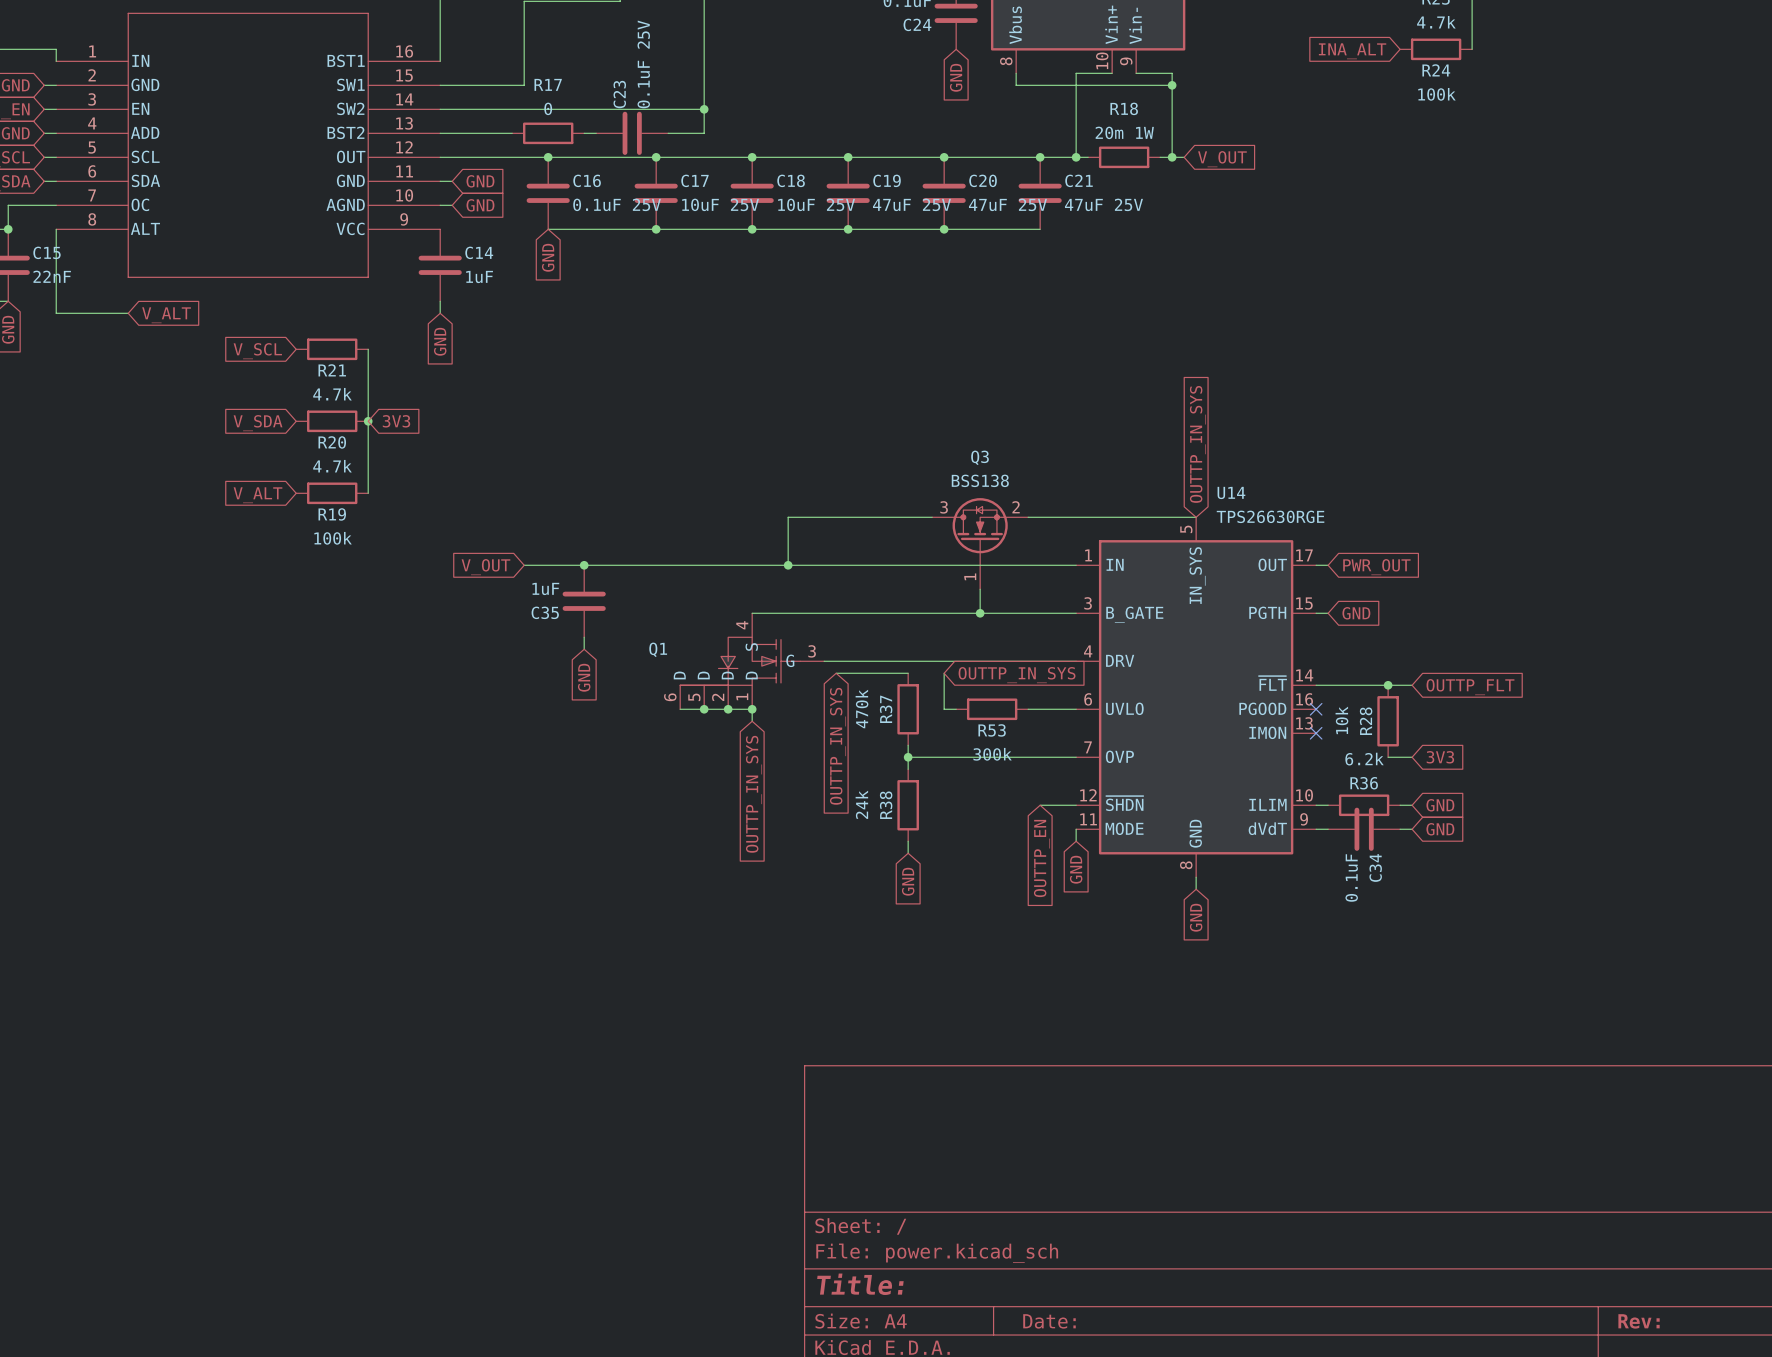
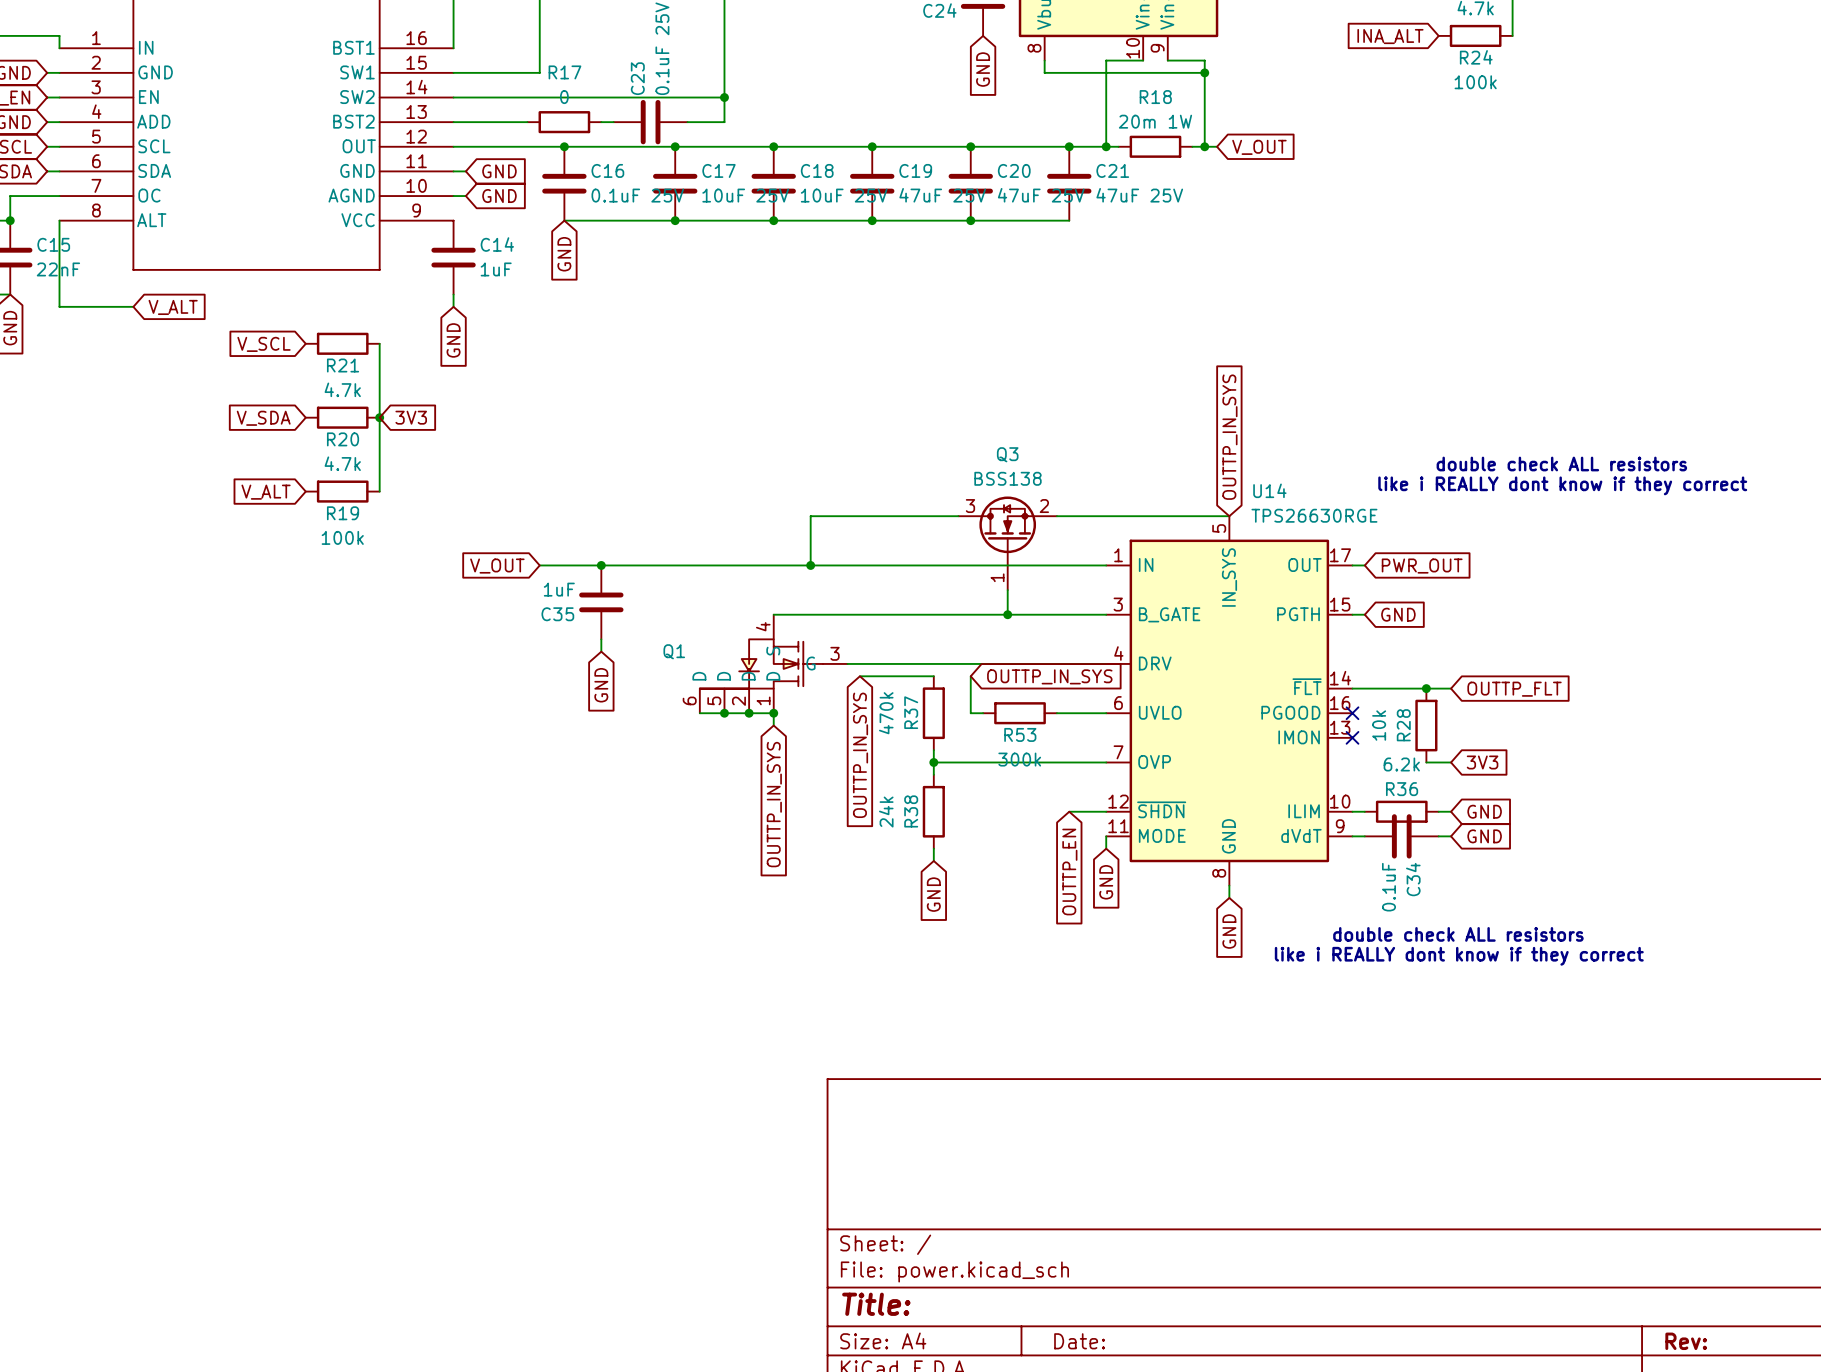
text: none -> double check ALL resistors (1561, 464)
text: none -> like i REALLY dont know if they correct (1562, 485)
text: none -> double check ALL resistors (1458, 934)
text: none -> like i REALLY dont know if they correct (1459, 956)

